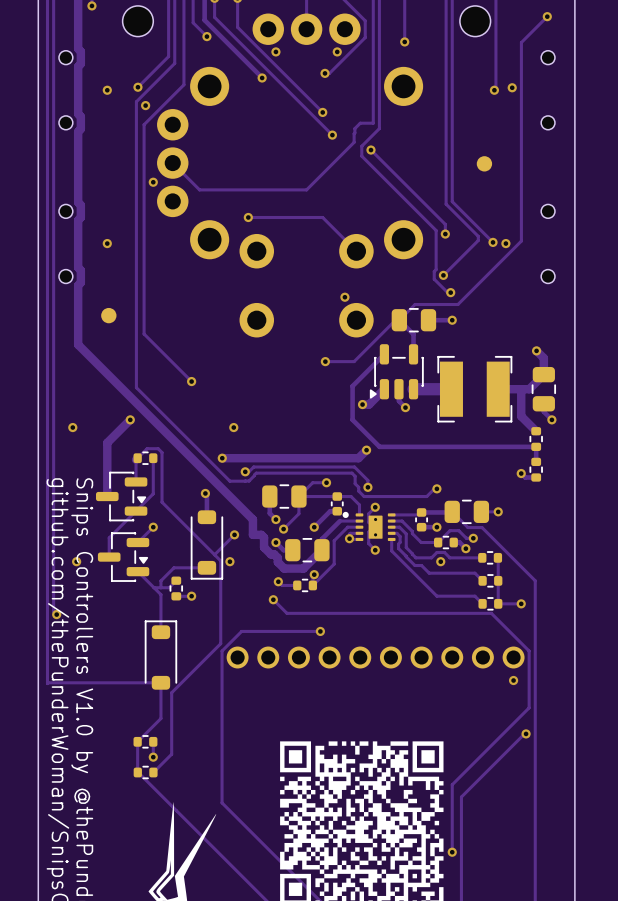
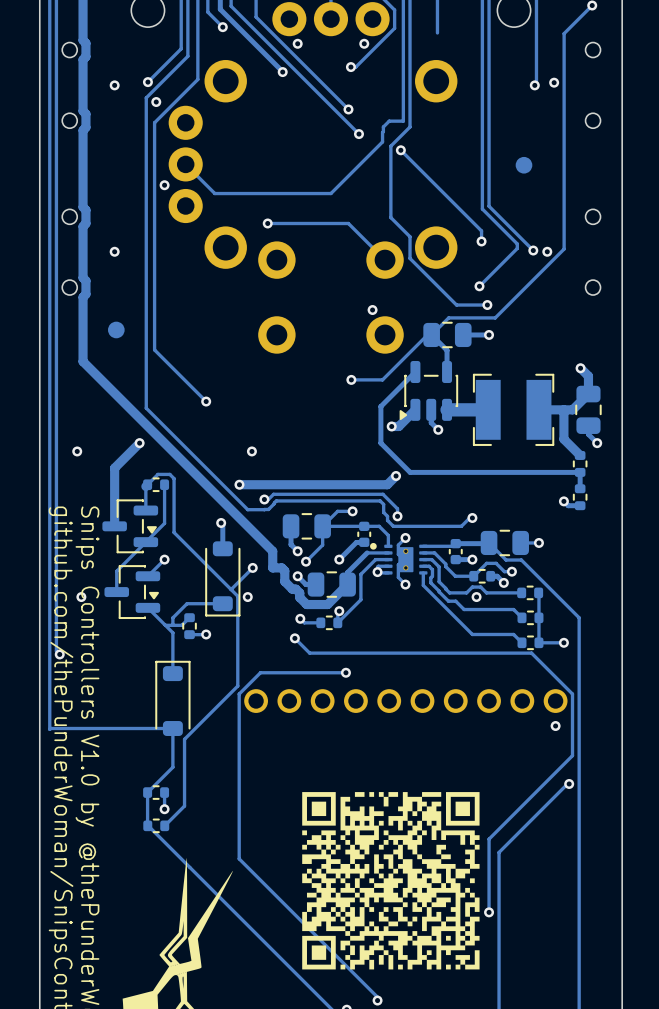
via: (404, 41) -> none
track: (361, 156) (436, 230) (436, 269) (434, 279) (447, 292) -> (390, 156) (390, 217) (410, 236) (410, 258) (456, 305) (484, 305)

